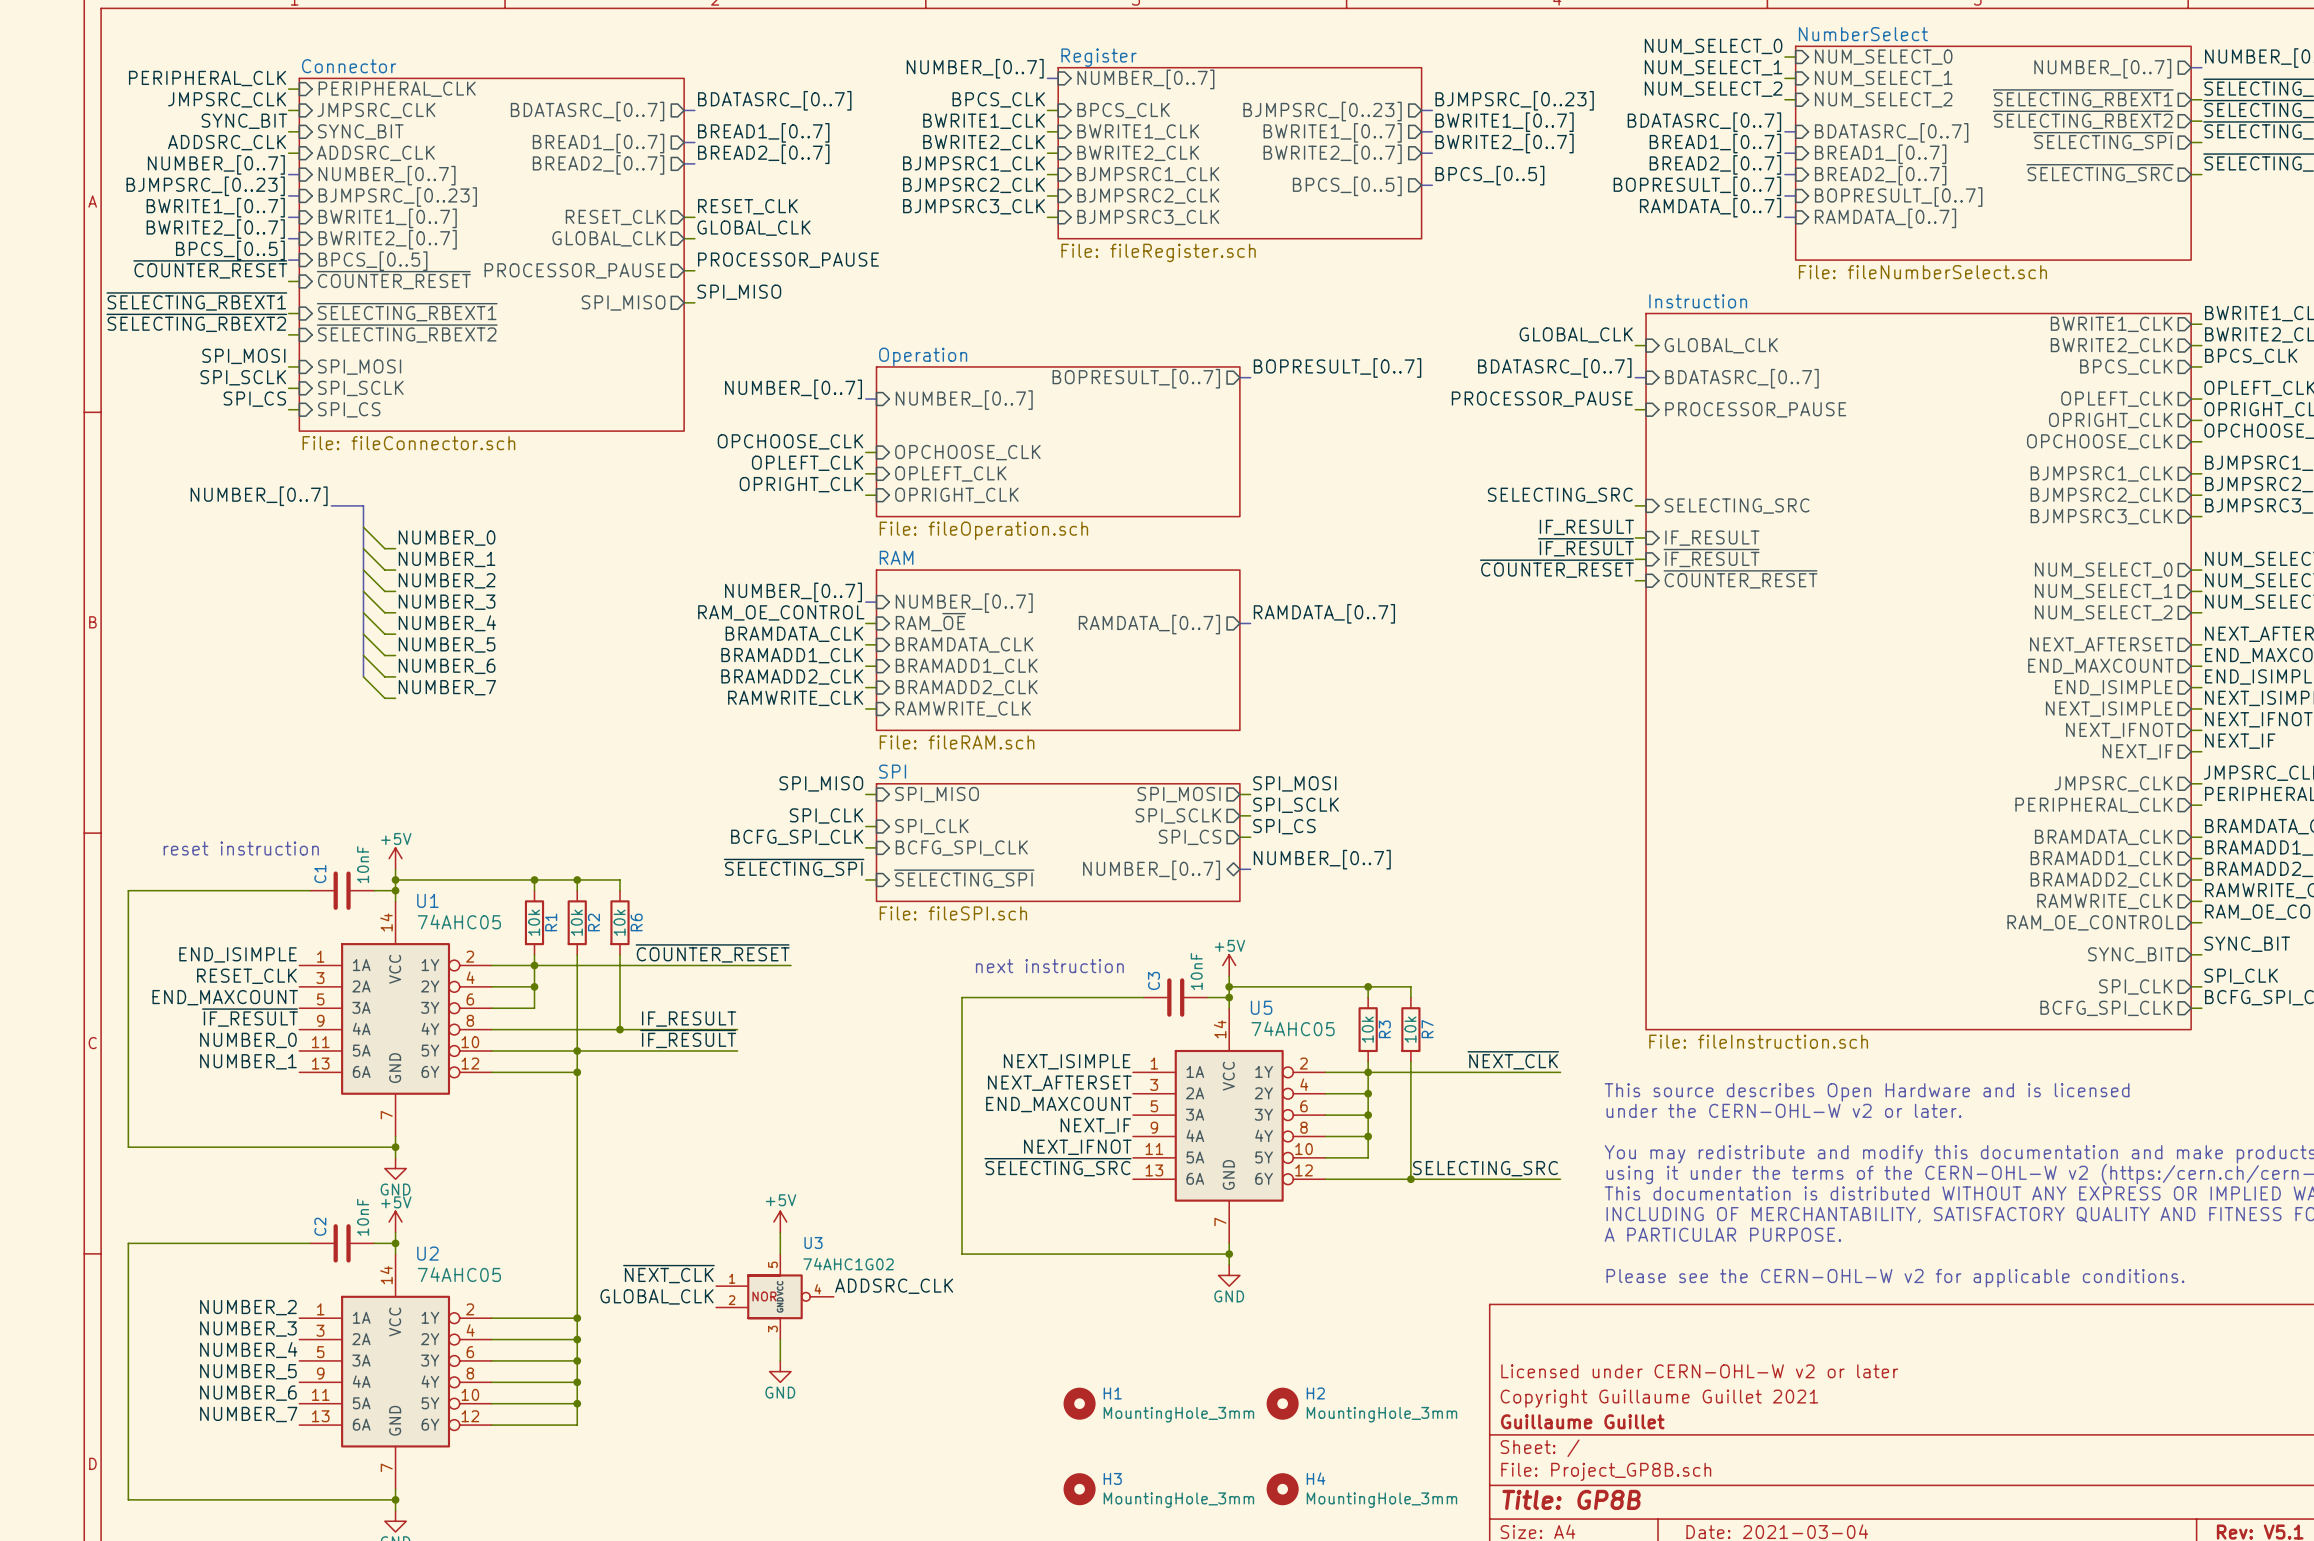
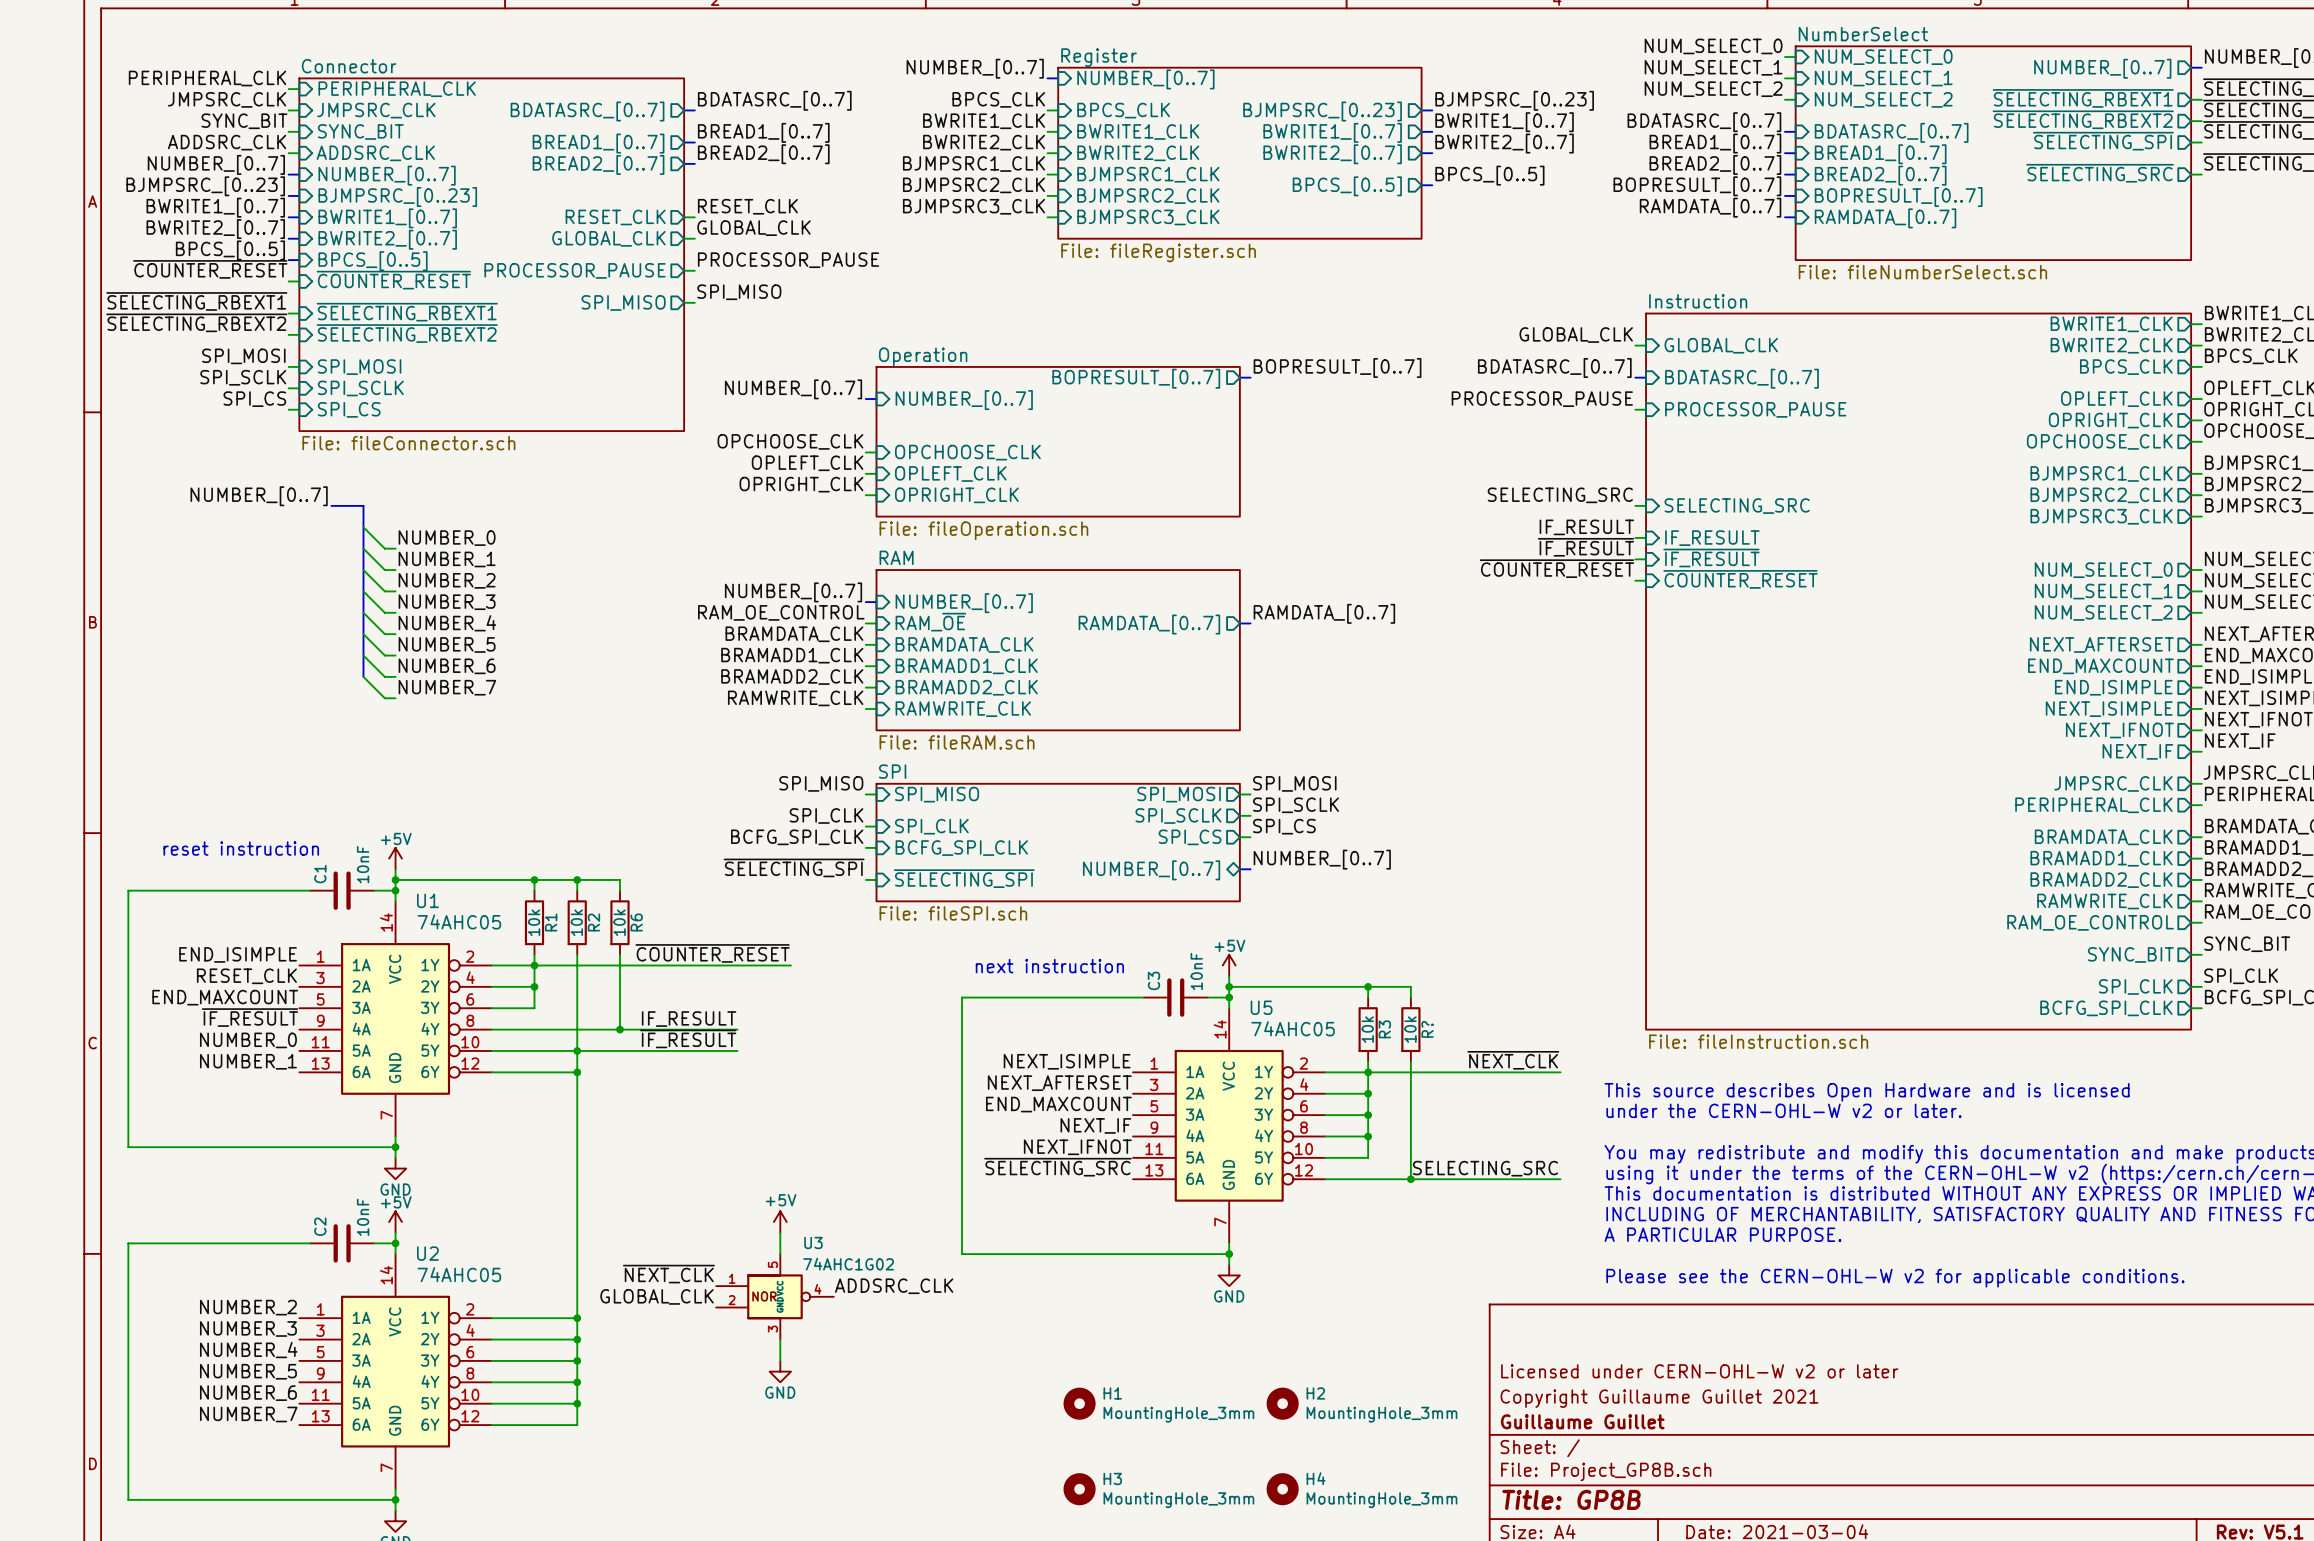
R7 name: R7 (1427, 1029) -> R? (1427, 1029)

